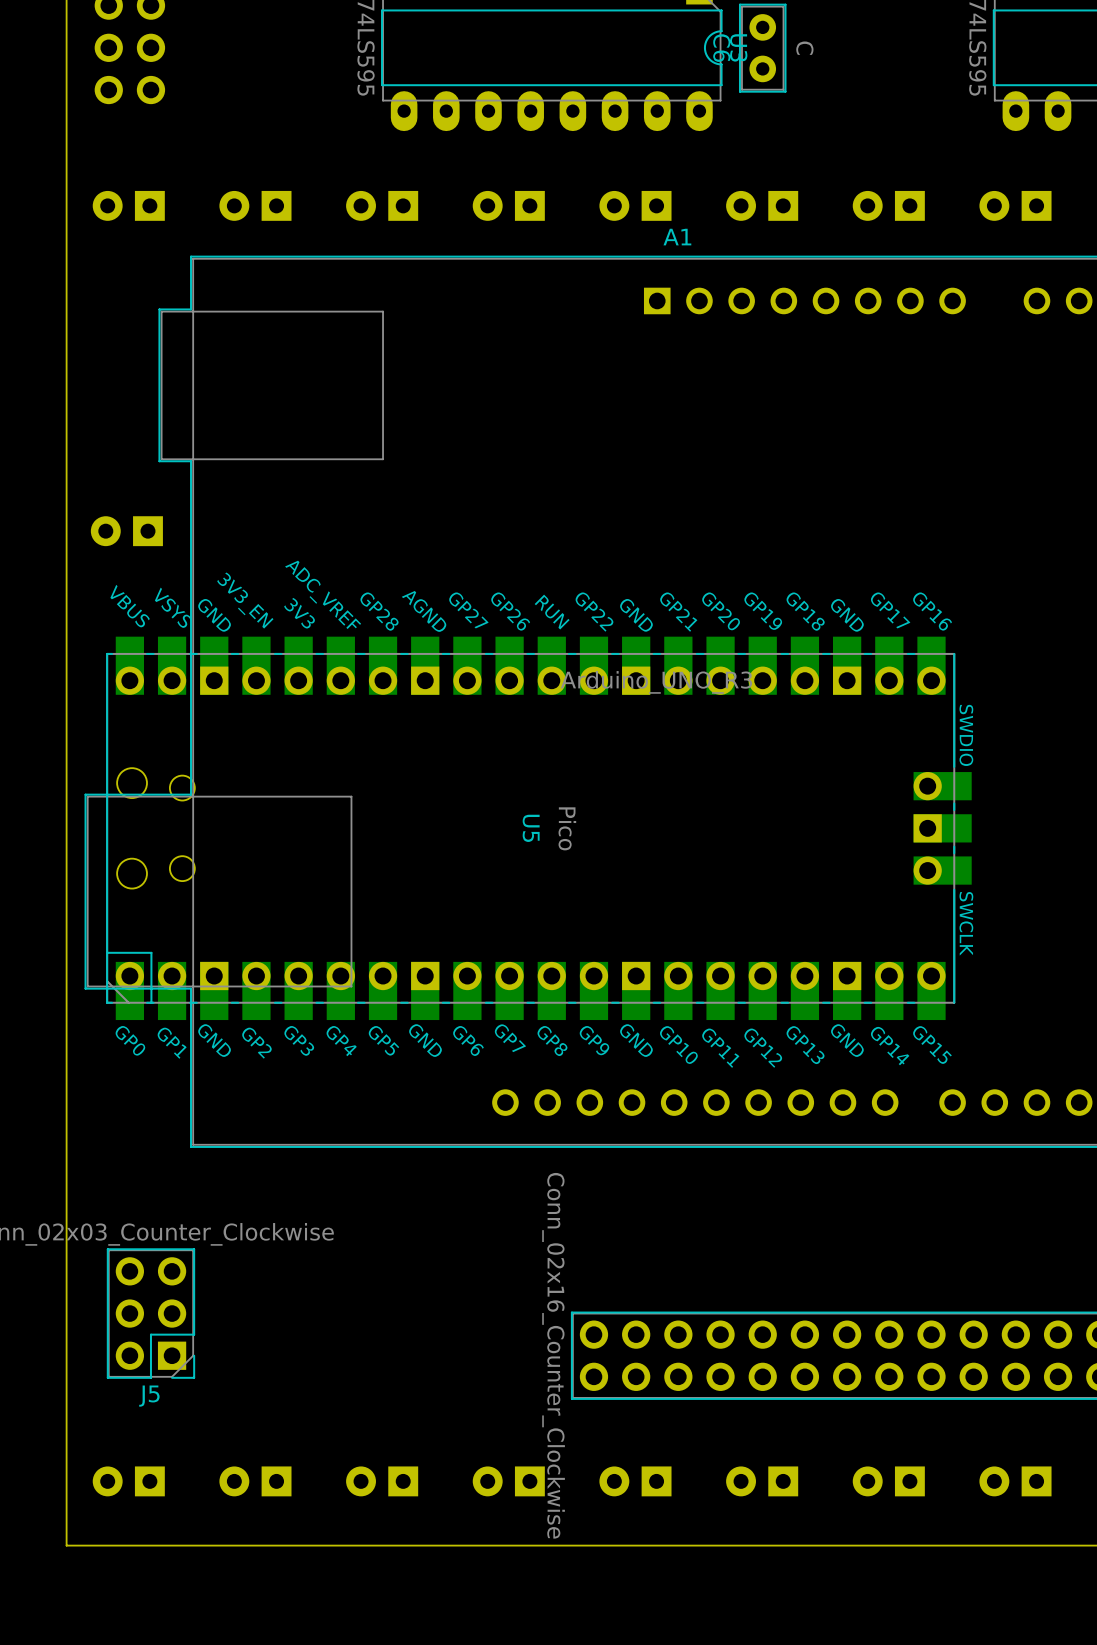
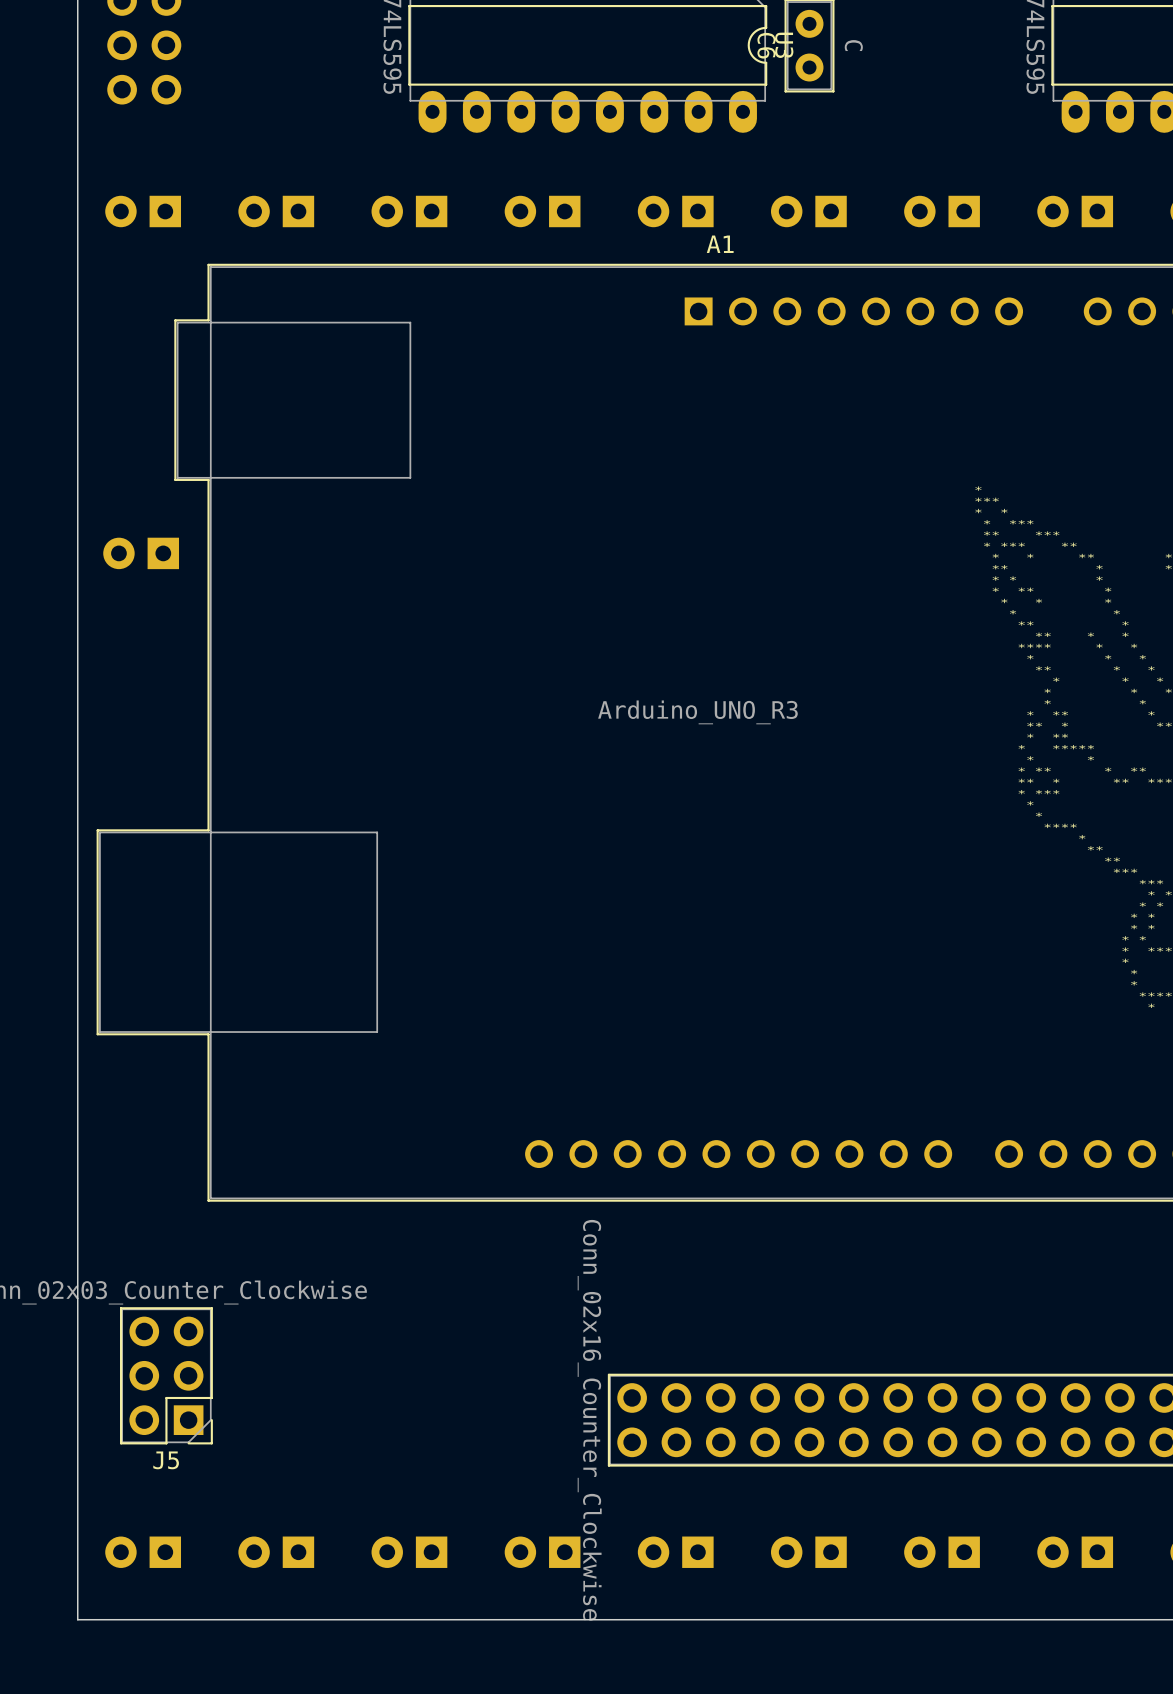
U5: Pico (538, 828) -> none

